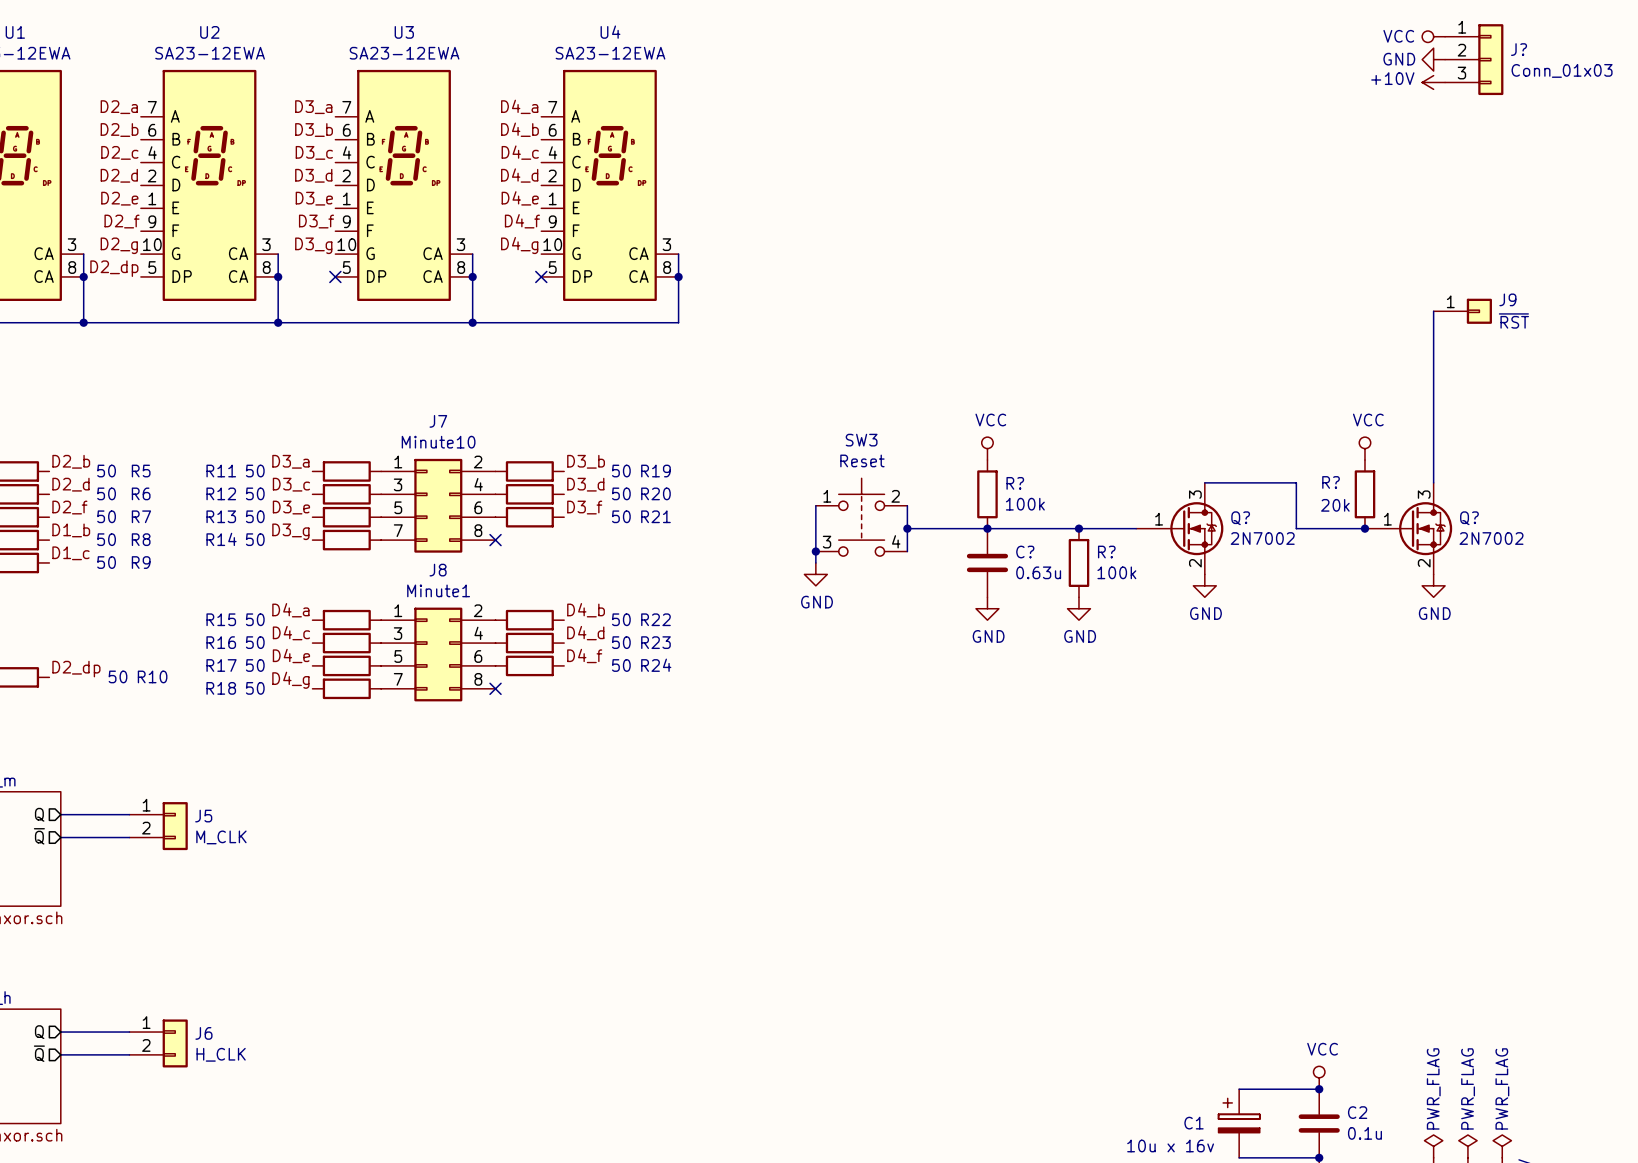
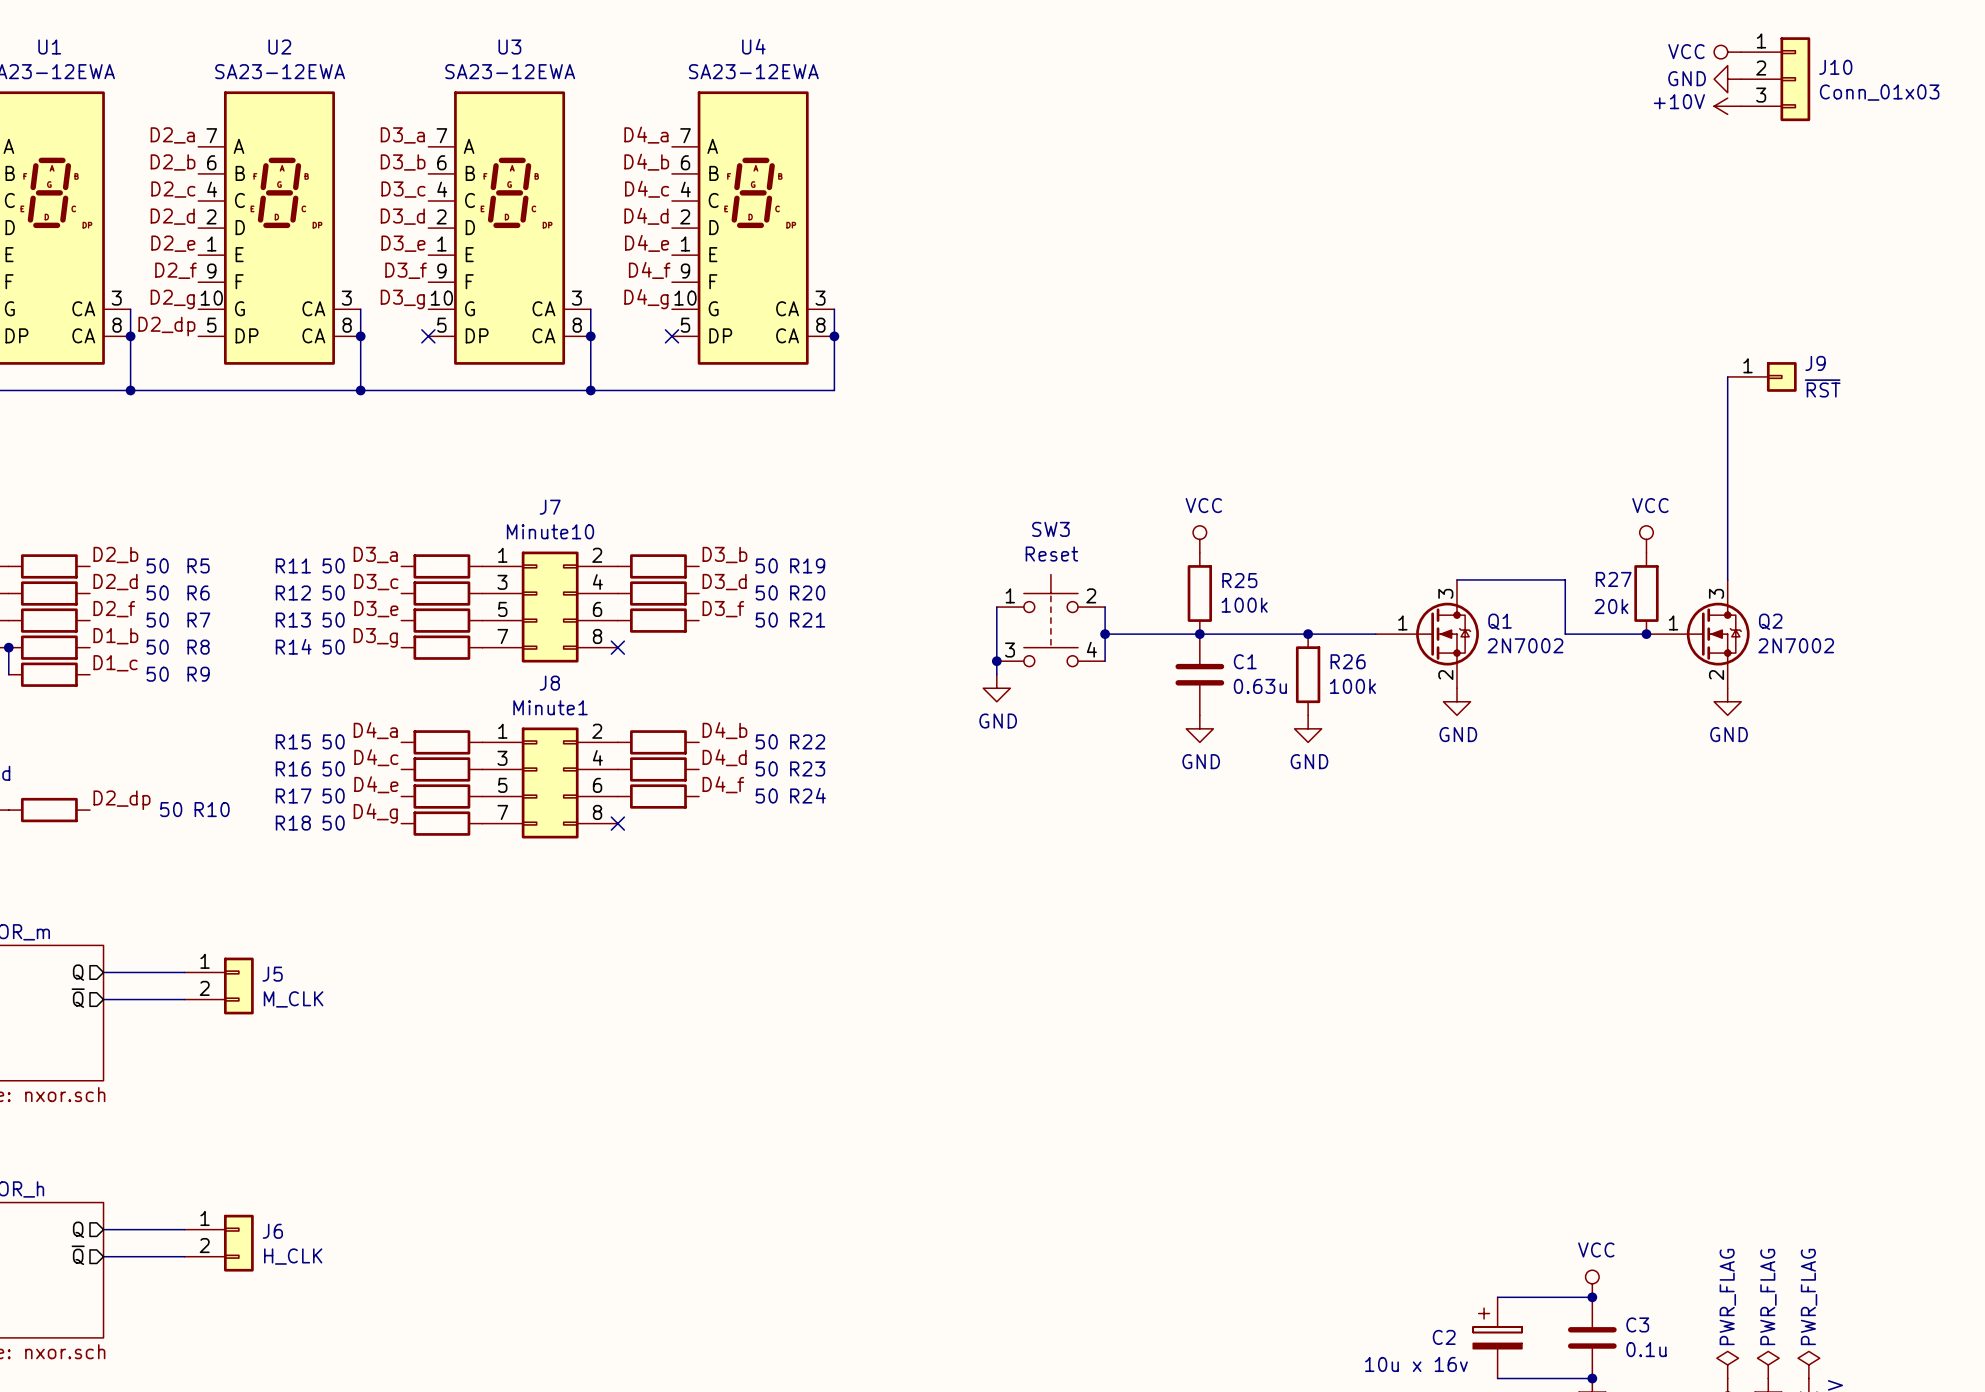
J? name: J? (1519, 49) -> J10 (1835, 67)
R? name: R? (1331, 482) -> R27 (1613, 579)
R? name: R? (1015, 483) -> R25 (1239, 580)
Q? name: Q? (1240, 518) -> Q1 (1500, 621)
Q? name: Q? (1469, 518) -> Q2 (1770, 621)
C? name: C? (1025, 552) -> C1 (1245, 661)
R? name: R? (1106, 552) -> R26 (1348, 661)
C2 name: C2 (1357, 1112) -> C3 (1637, 1324)
C1 name: C1 (1194, 1123) -> C2 (1444, 1337)

